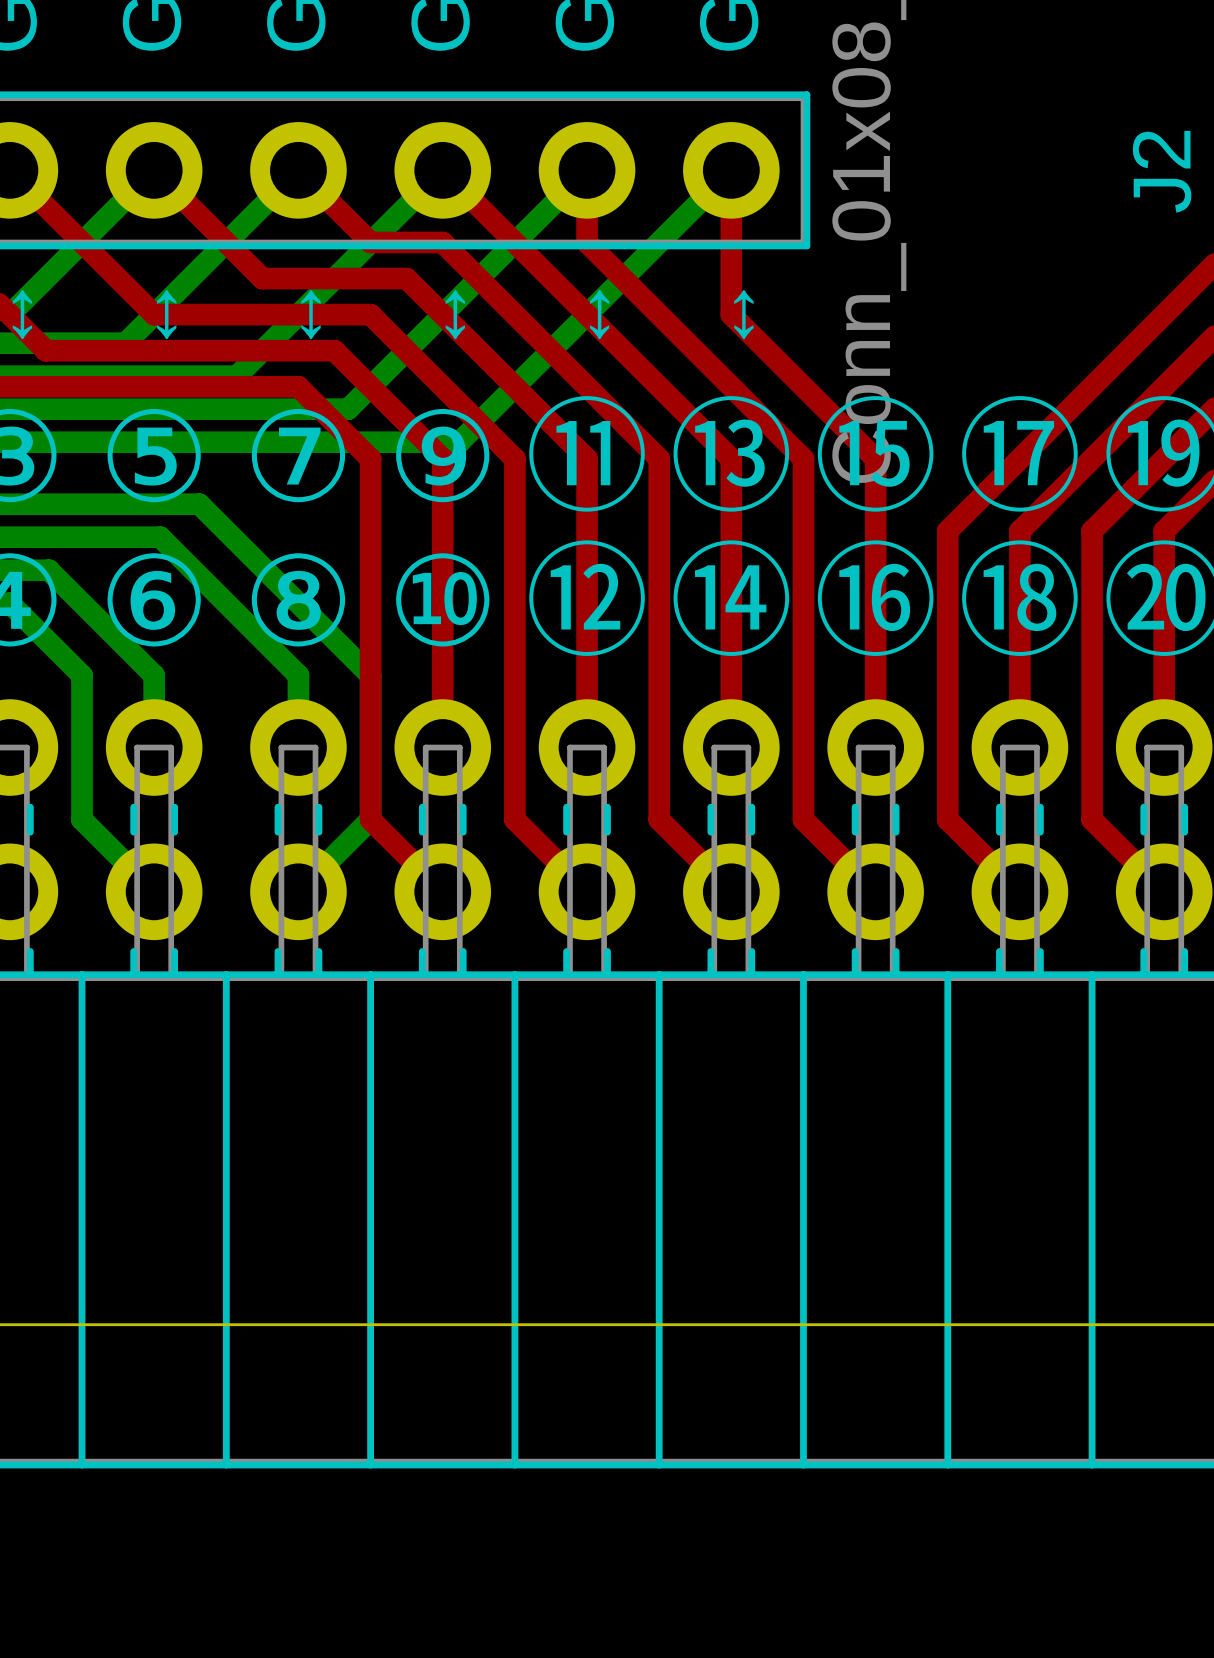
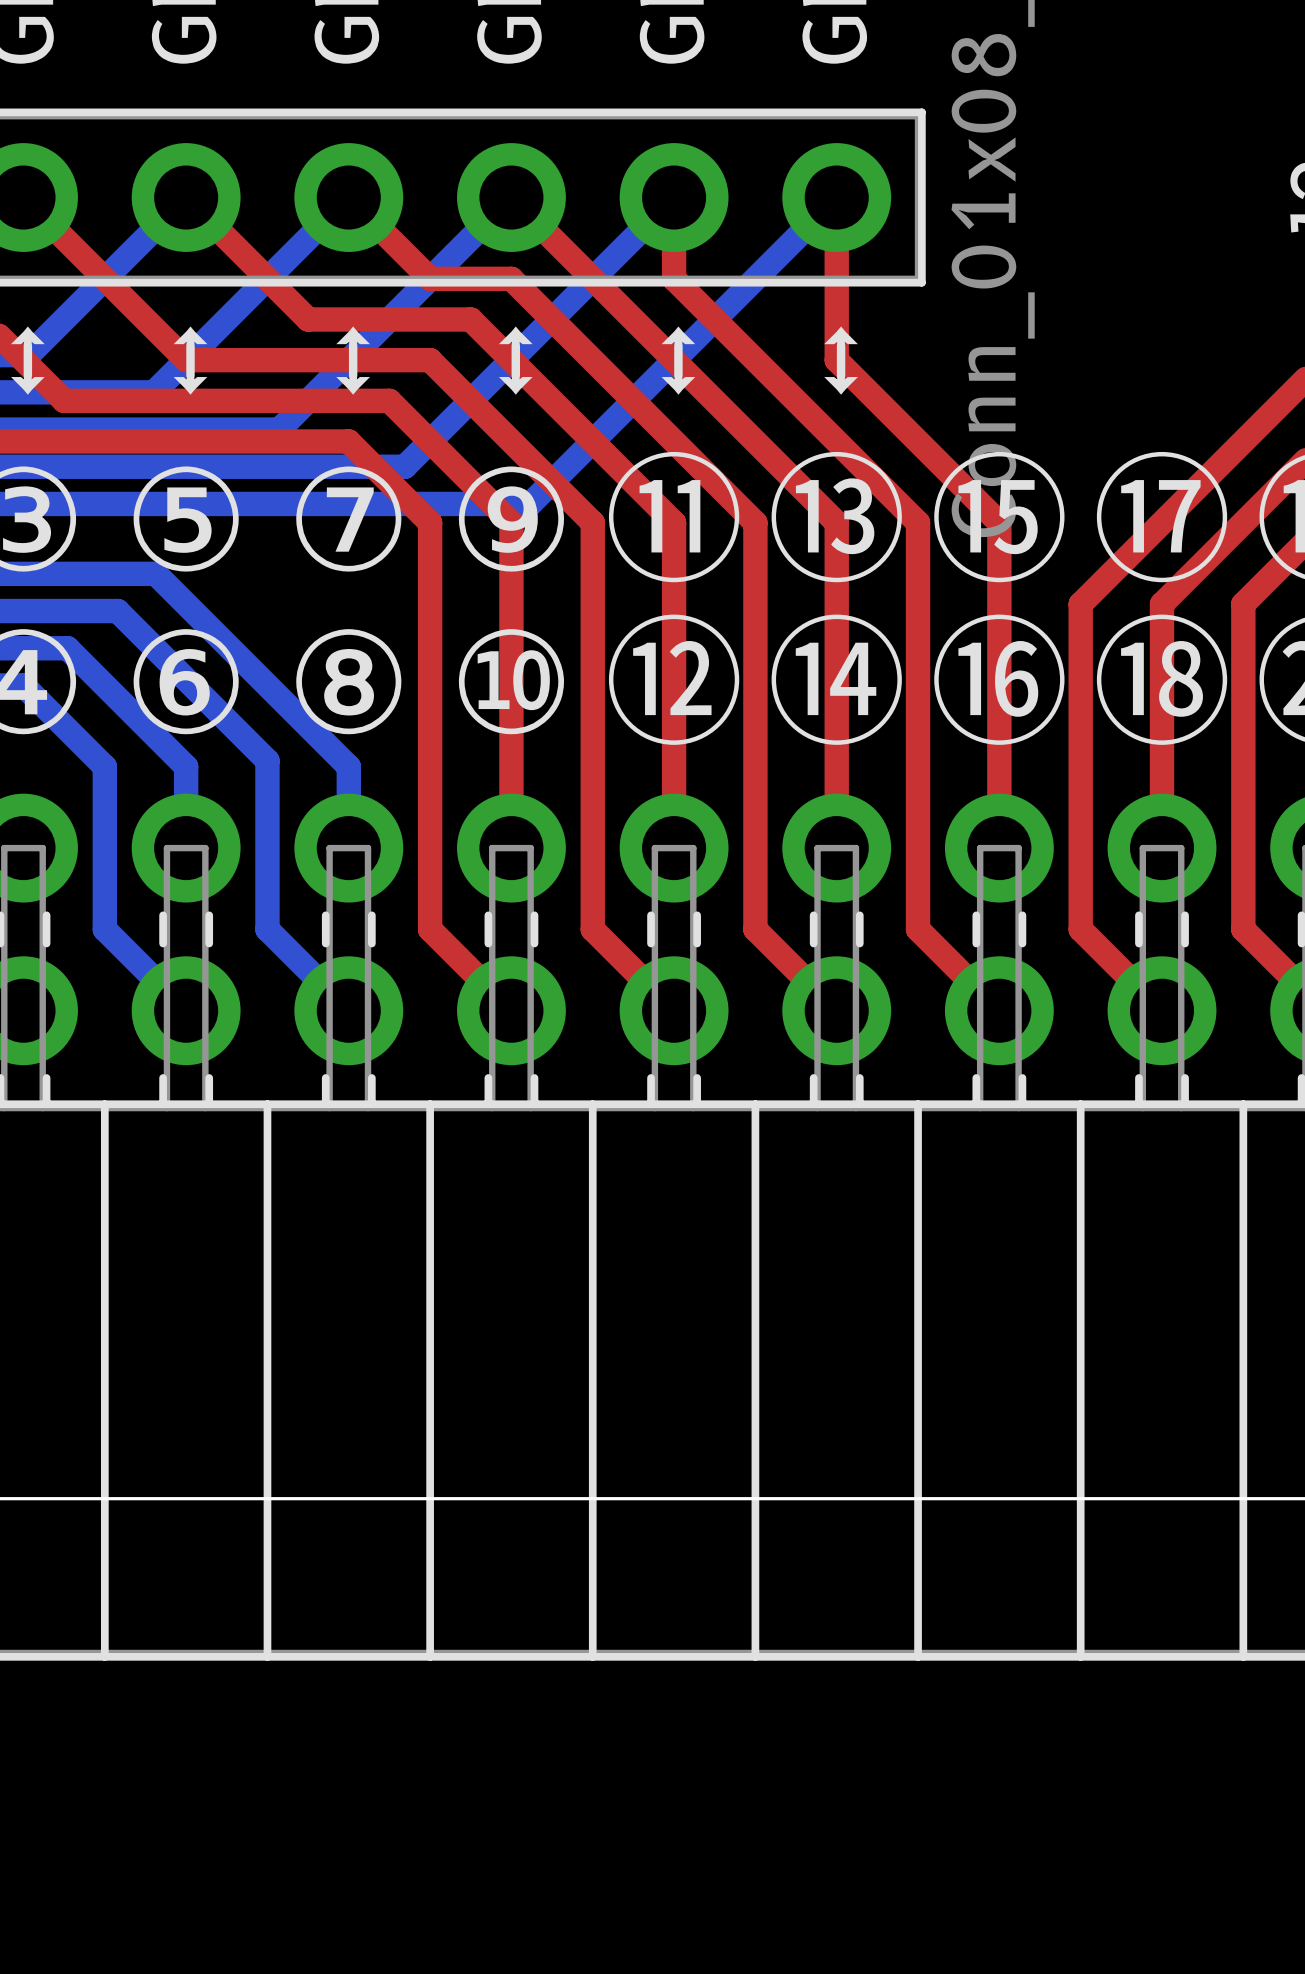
bottom track: (127, 504) (199, 504) (370, 675) (370, 819) (298, 891) -> (117, 611) (267, 760) (267, 929) (348, 1010)
bottom track: (93, 537) (160, 537) -> (155, 573) (193, 611)

